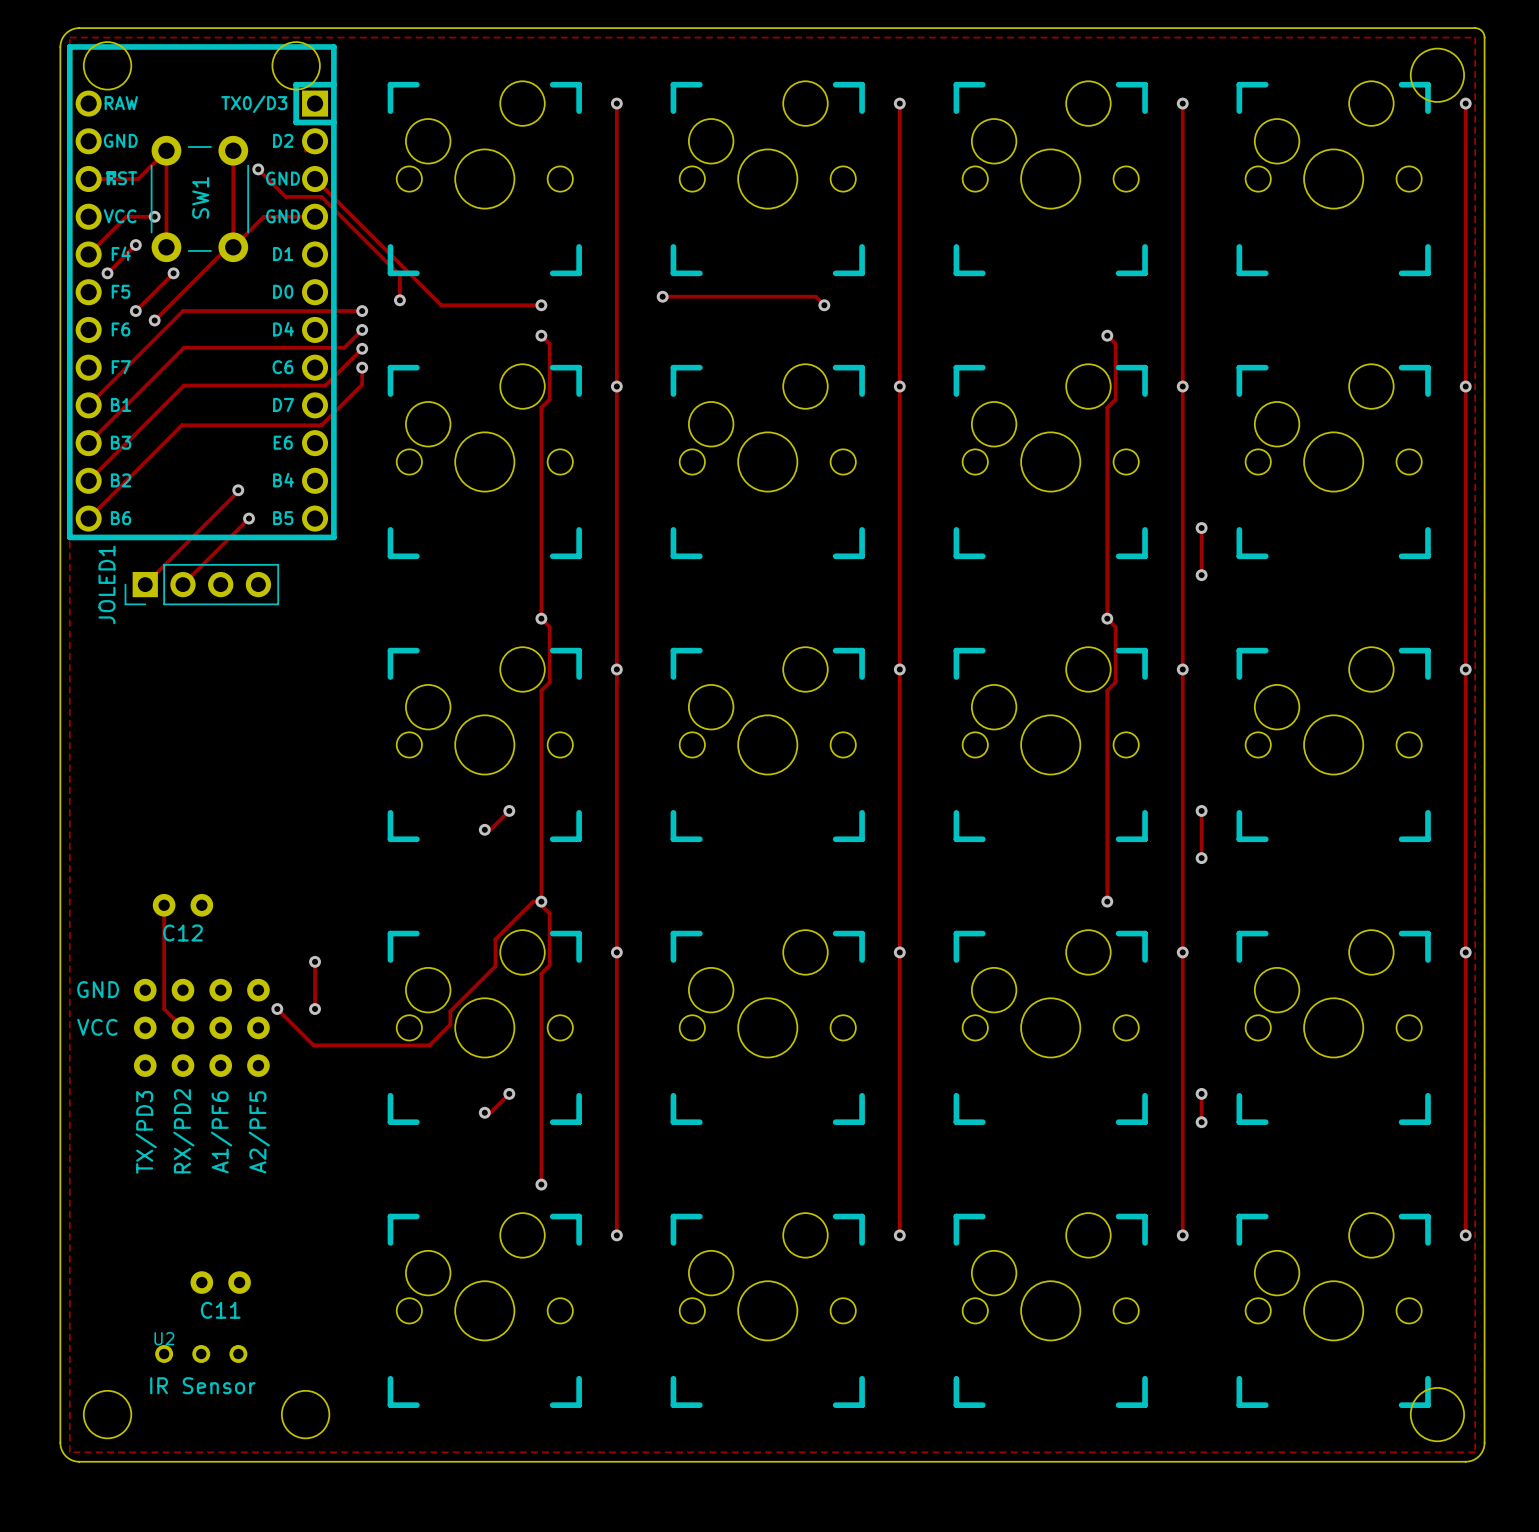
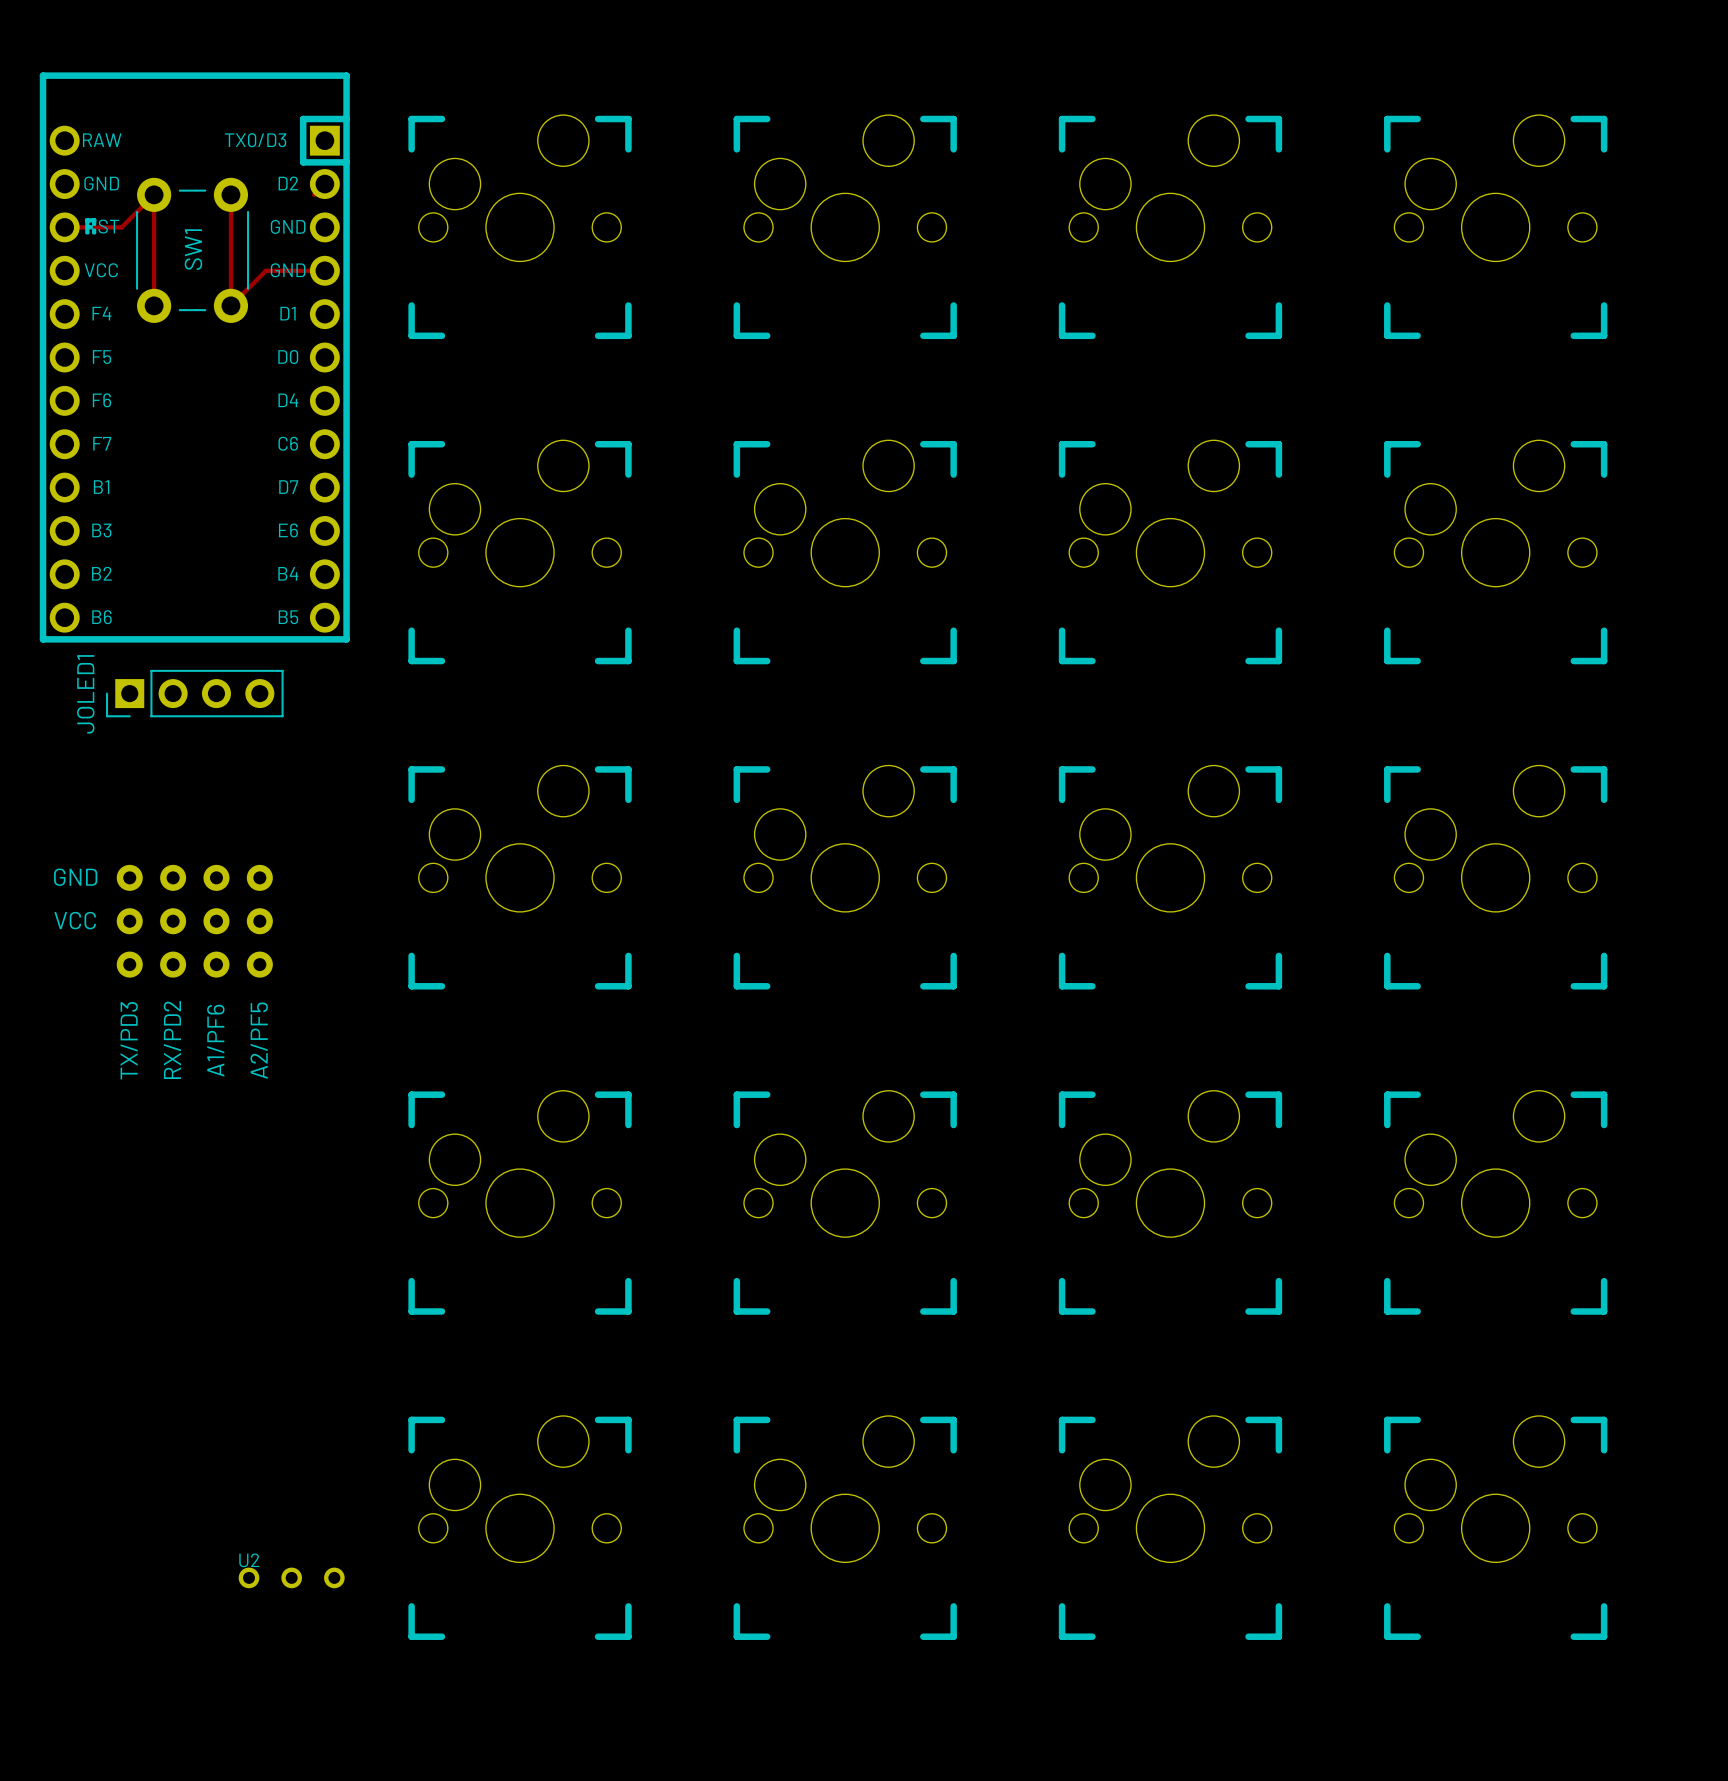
zone outline: (69, 37) (69, 1452) (1475, 1452) (1475, 37) (69, 37) -> none
round board edge: [83, 41, 133, 91] -> none
round board edge: [271, 41, 321, 91] -> none
board edge: (60, 46) (65, 33) (79, 28) (1475, 28) (1481, 30) (1484, 37) (1484, 1442) (1479, 1456) (1465, 1461) (79, 1461) (65, 1456) (60, 1442) (60, 46) -> none
round board edge: [1410, 47, 1465, 103] -> none
track: (616, 103) (616, 1235) -> none
via: (616, 103) -> none
track: (899, 103) (899, 1235) -> none
via: (899, 103) -> none
track: (1182, 103) (1182, 1235) -> none
via: (1182, 103) -> none
track: (1465, 103) (1465, 1235) -> none
via: (1465, 103) -> none
track: (258, 169) (285, 196) (321, 196) (399, 275) (399, 300) -> none
via: (258, 169) -> none
track: (315, 179) (441, 305) (541, 305) -> none
track: (154, 216) (126, 216) (88, 254) -> none
via: (154, 216) -> none
track: (135, 245) (107, 273) -> none
via: (135, 245) -> none
track: (233, 247) (227, 247) (154, 320) -> none
via: (107, 273) -> none
track: (173, 273) (135, 311) -> none
via: (173, 273) -> none
track: (662, 296) (815, 296) (824, 305) -> none
via: (662, 296) -> none
via: (399, 300) -> none
via: (541, 305) -> none
via: (824, 305) -> none
via: (135, 311) -> none
track: (362, 311) (182, 311) (88, 405) -> none
via: (362, 311) -> none
via: (154, 320) -> none
track: (362, 329) (344, 347) (184, 347) (88, 443) -> none
via: (362, 329) -> none
track: (541, 335) (549, 343) (549, 399) (541, 407) (541, 618) (549, 626) (549, 682) (541, 690) (541, 905) (549, 913) (549, 965) (541, 973) (541, 1184) -> none
via: (541, 335) -> none
track: (1107, 335) (1115, 343) (1115, 399) (1107, 407) (1107, 618) (1115, 626) (1115, 682) (1107, 690) (1107, 901) -> none
via: (1107, 335) -> none
track: (362, 348) (325, 385) (184, 385) (88, 480) -> none
via: (362, 348) -> none
track: (362, 367) (362, 384) (321, 425) (181, 425) (88, 518) -> none
via: (362, 367) -> none
via: (616, 386) -> none
via: (899, 386) -> none
via: (1182, 386) -> none
via: (1465, 386) -> none
track: (238, 490) (145, 584) -> none
via: (238, 490) -> none
track: (249, 518) (182, 584) -> none
via: (249, 518) -> none
track: (1201, 527) (1201, 575) -> none
via: (1201, 527) -> none
via: (1201, 575) -> none
via: (541, 618) -> none
via: (1107, 618) -> none
via: (616, 669) -> none
via: (899, 669) -> none
via: (1182, 669) -> none
via: (1465, 669) -> none
track: (509, 810) (490, 829) (484, 829) -> none
via: (509, 810) -> none
track: (1201, 810) (1201, 858) -> none
via: (1201, 810) -> none
via: (484, 829) -> none
via: (1201, 858) -> none
track: (541, 901) (533, 901) (495, 939) (495, 966) (450, 1011) (450, 1024) (429, 1045) (313, 1045) (277, 1009) -> none
via: (541, 901) -> none
via: (1107, 901) -> none
track: (164, 905) (164, 1009) (182, 1027) -> none
C12: (182, 905) -> none
via: (616, 952) -> none
via: (899, 952) -> none
via: (1182, 952) -> none
via: (1465, 952) -> none
track: (315, 961) (315, 1009) -> none
via: (315, 961) -> none
via: (277, 1009) -> none
via: (315, 1009) -> none
part position: (201, 1027) -> (194, 921)
track: (509, 1093) (490, 1112) (484, 1112) -> none
via: (509, 1093) -> none
track: (1201, 1093) (1201, 1122) -> none
via: (1201, 1093) -> none
via: (484, 1112) -> none
via: (1201, 1122) -> none
via: (541, 1184) -> none
via: (616, 1235) -> none
via: (899, 1235) -> none
via: (1182, 1235) -> none
via: (1465, 1235) -> none
C11: (220, 1282) -> none
U2 position: (201, 1353) -> (291, 1577)
text: IR Sensor (202, 1385) -> none
round board edge: [1410, 1387, 1465, 1443] -> none
round board edge: [83, 1390, 133, 1440] -> none
round board edge: [281, 1390, 331, 1440] -> none

